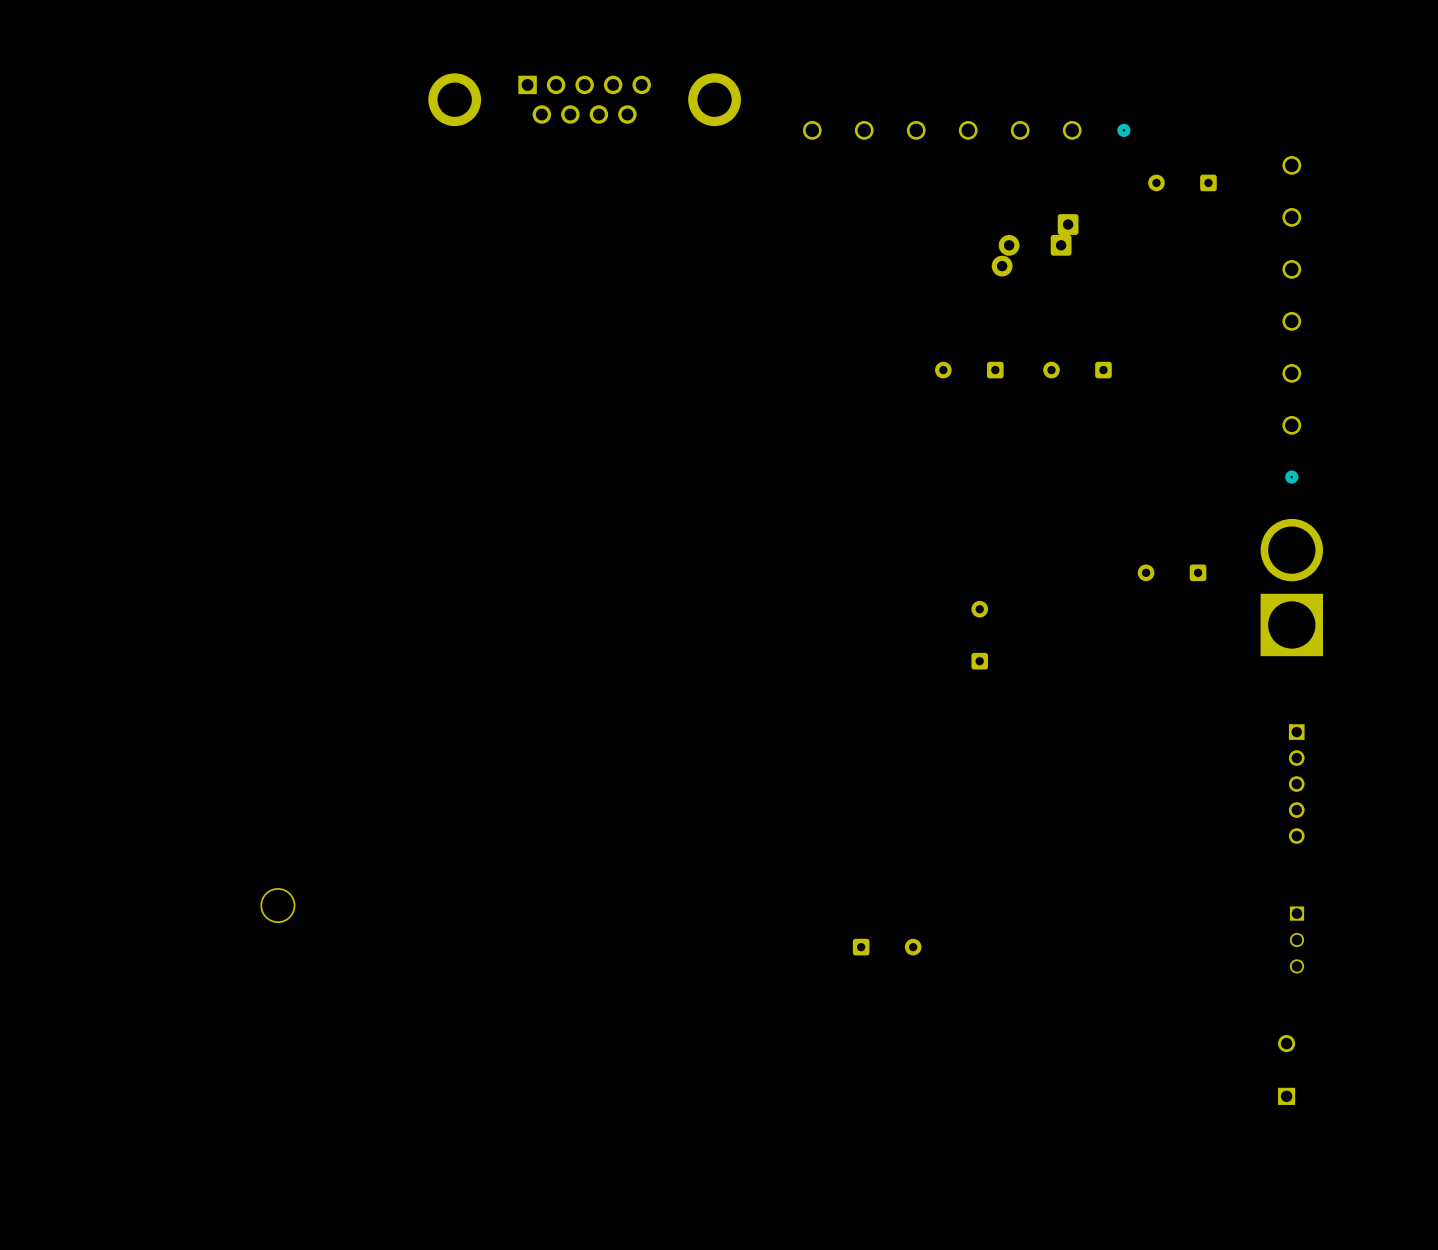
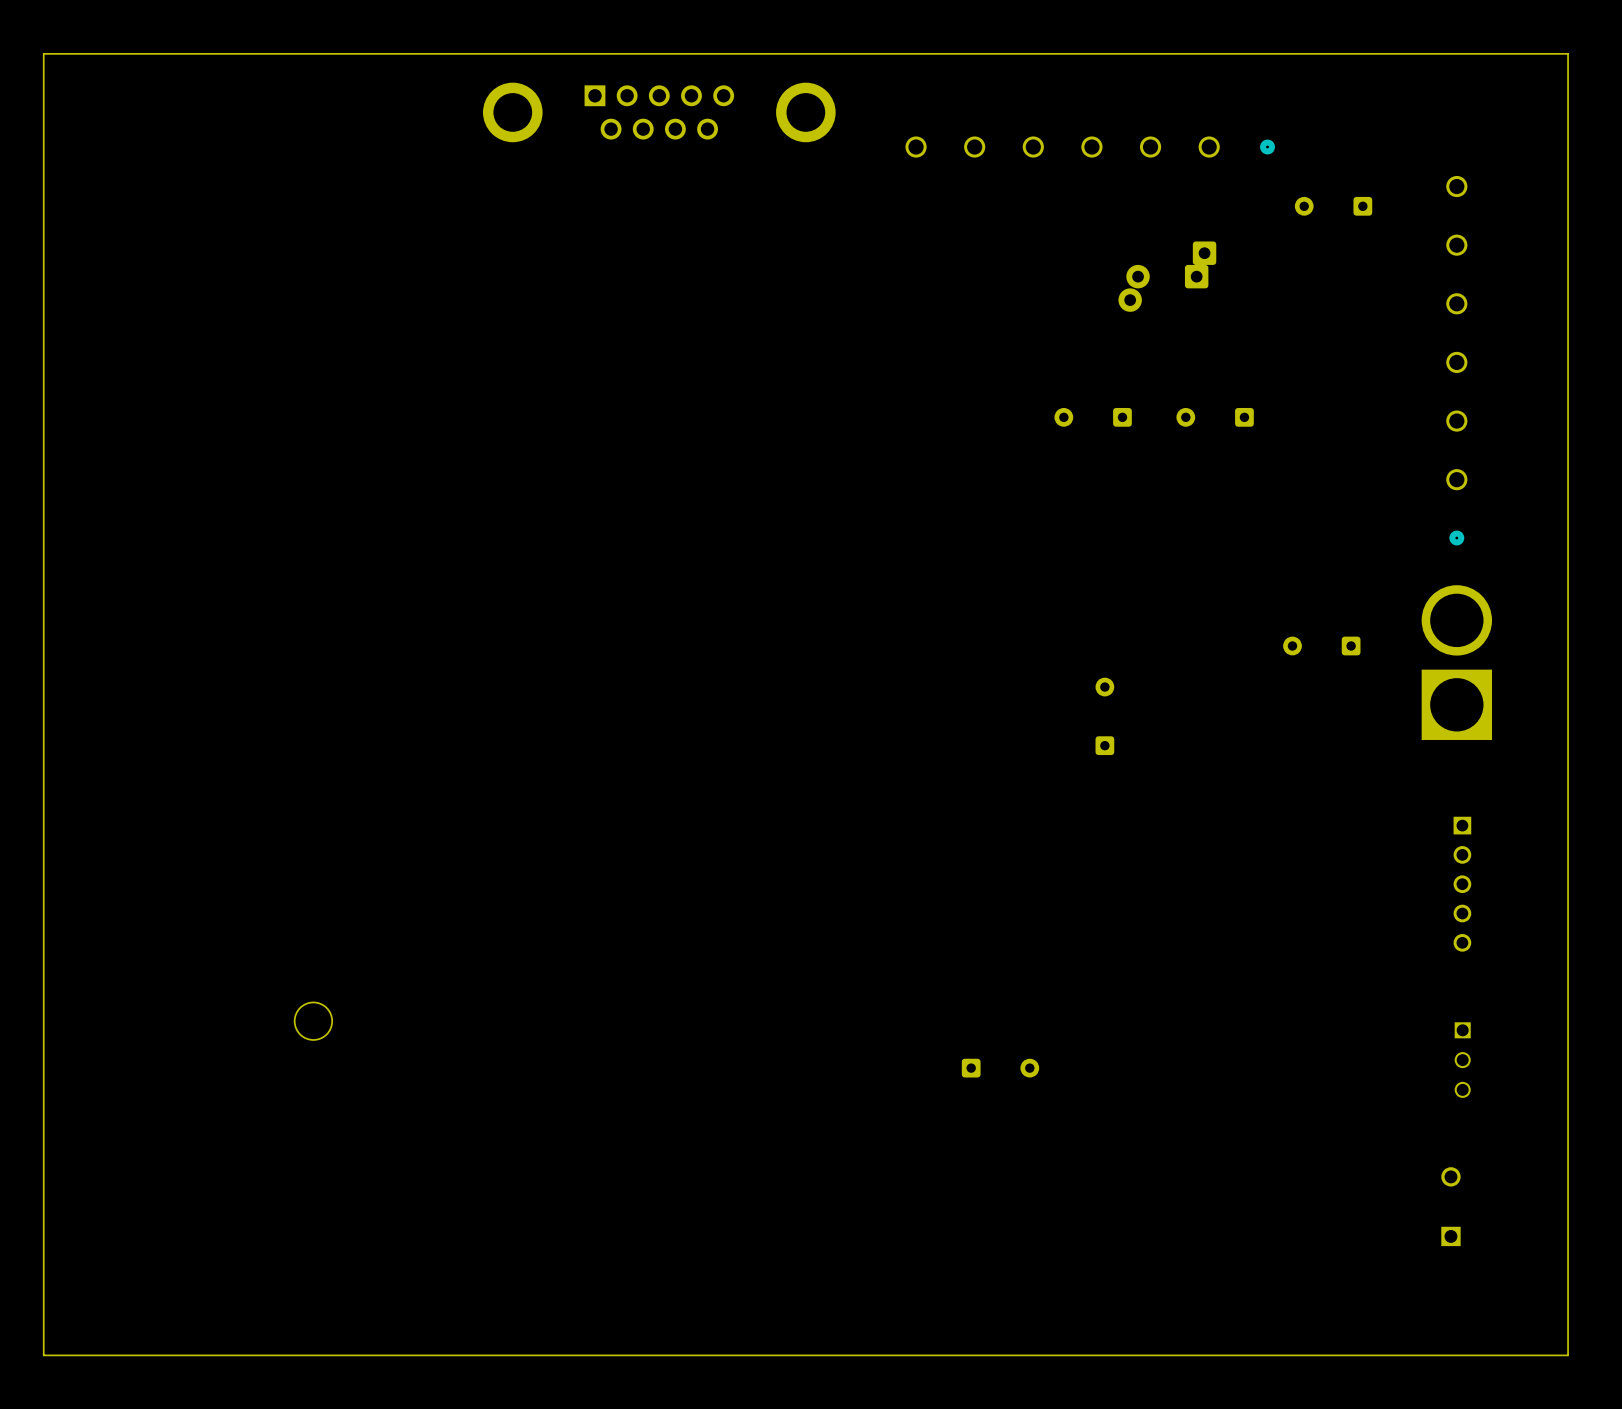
board edge: none -> (1568, 53) (43, 53) (43, 1355) (1568, 1355) (1568, 53)

